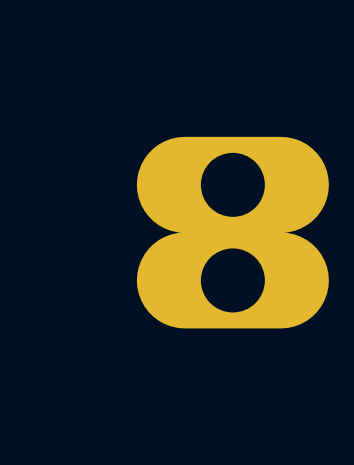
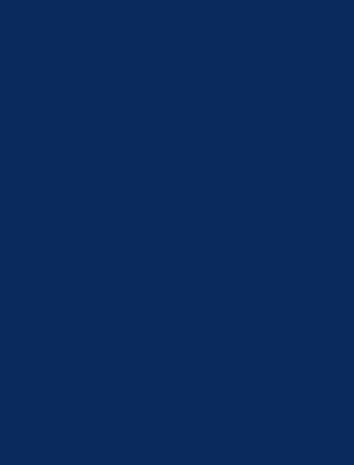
part: (232, 232) -> none

